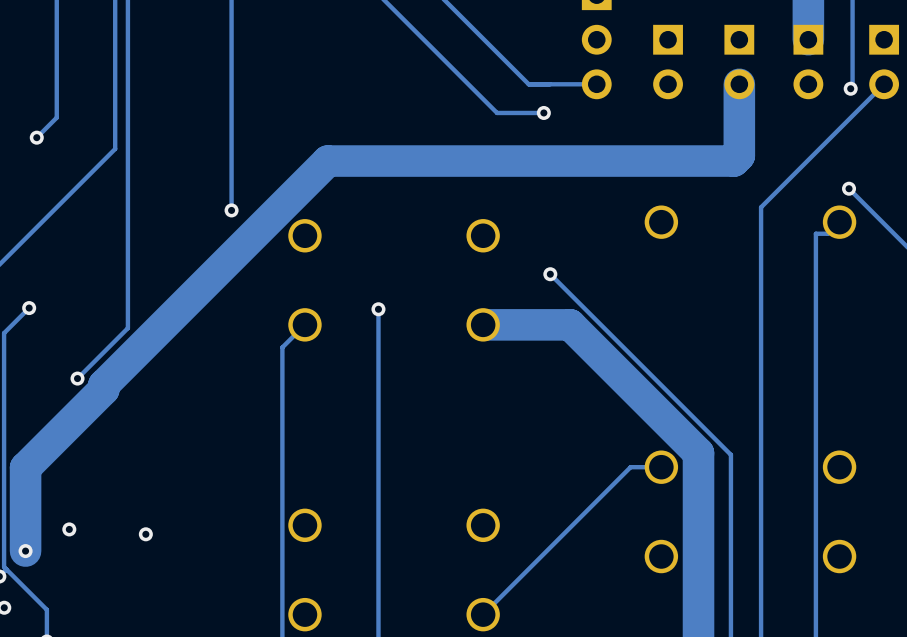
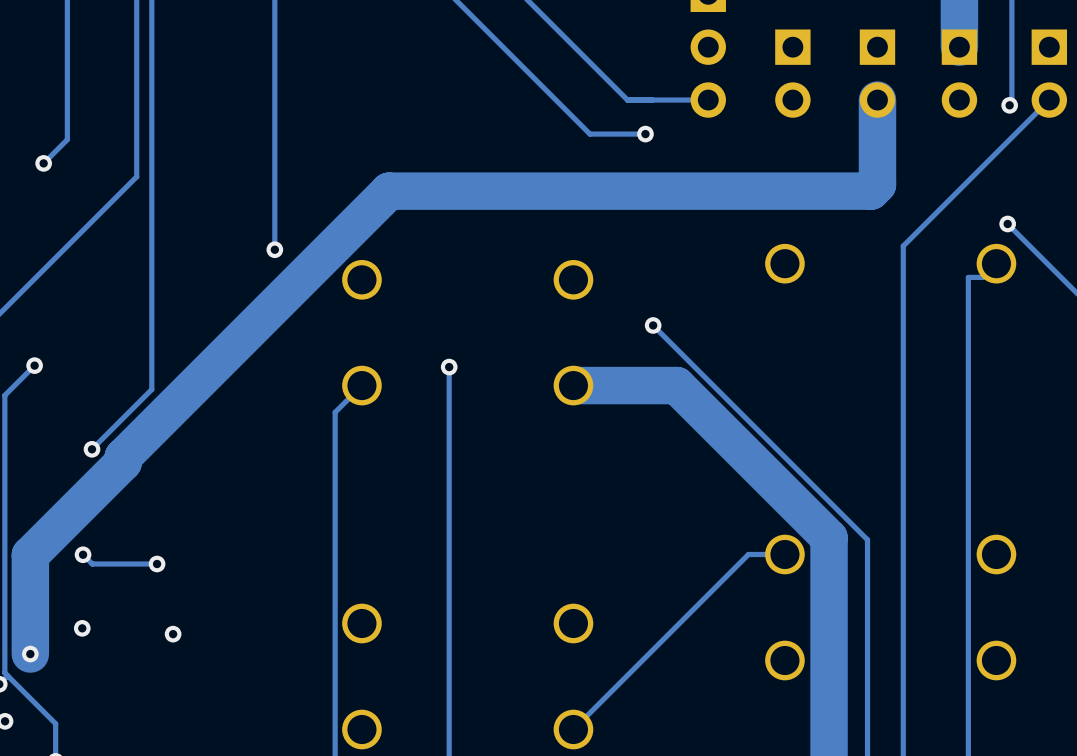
track: none -> (83, 554) (92, 564) (157, 564)
via: none -> (83, 554)
via: none -> (157, 564)

